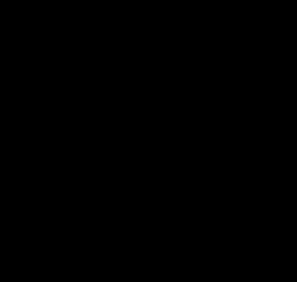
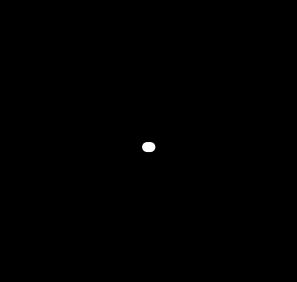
board edge: none -> (150, 147) (147, 147)

